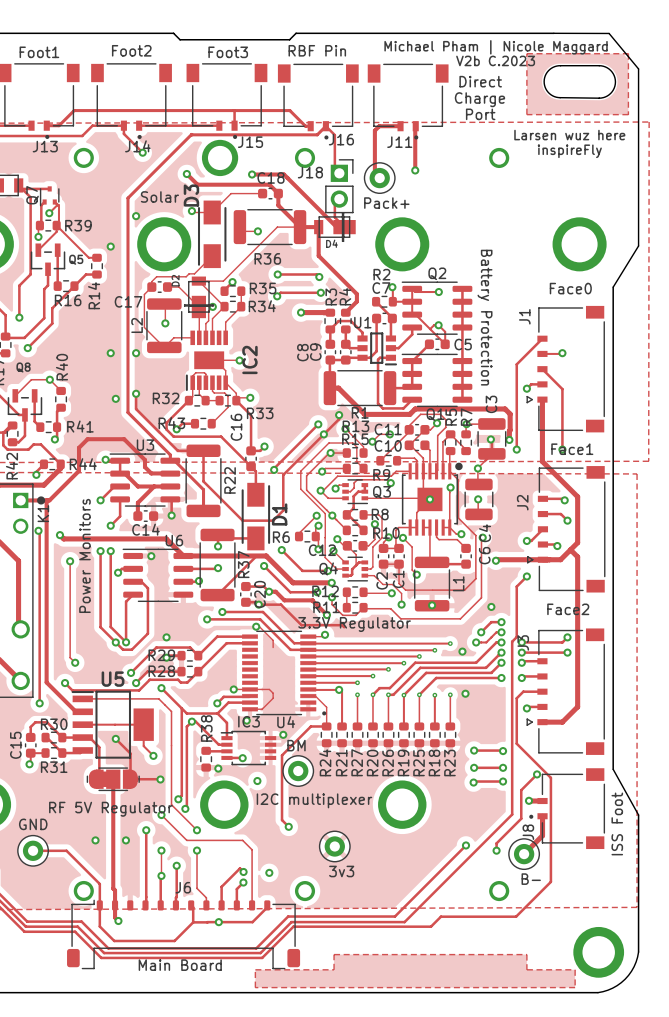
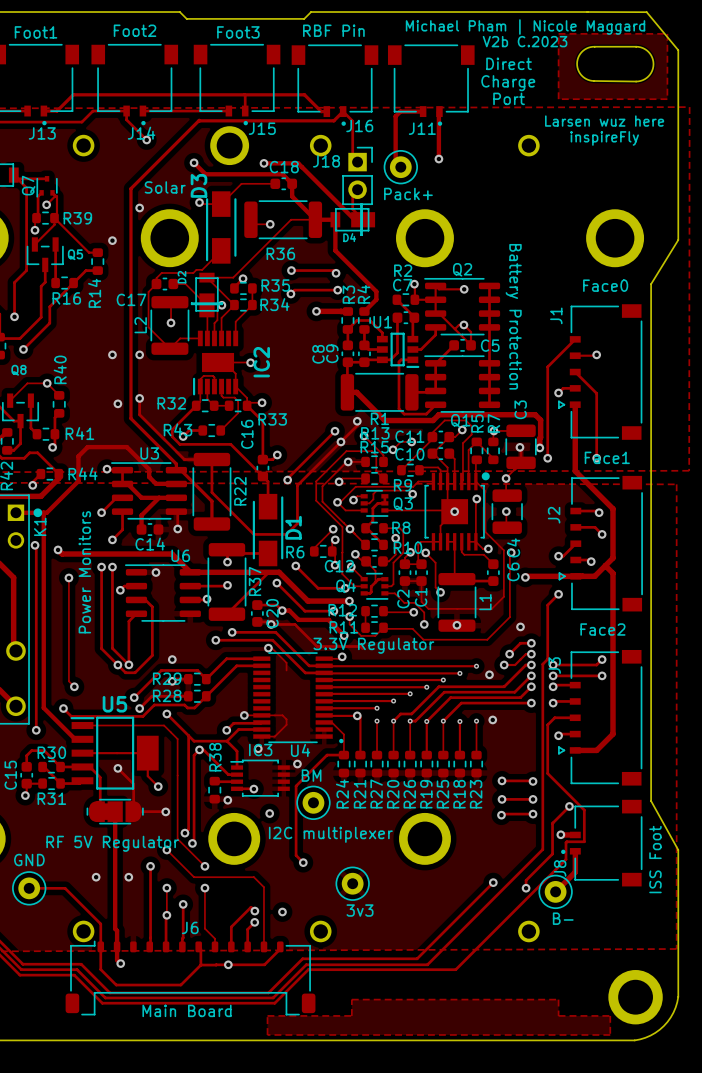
track: (550, 807) (550, 881) (516, 916) (440, 916) -> (584, 841) (566, 841) (566, 859) (466, 958)

